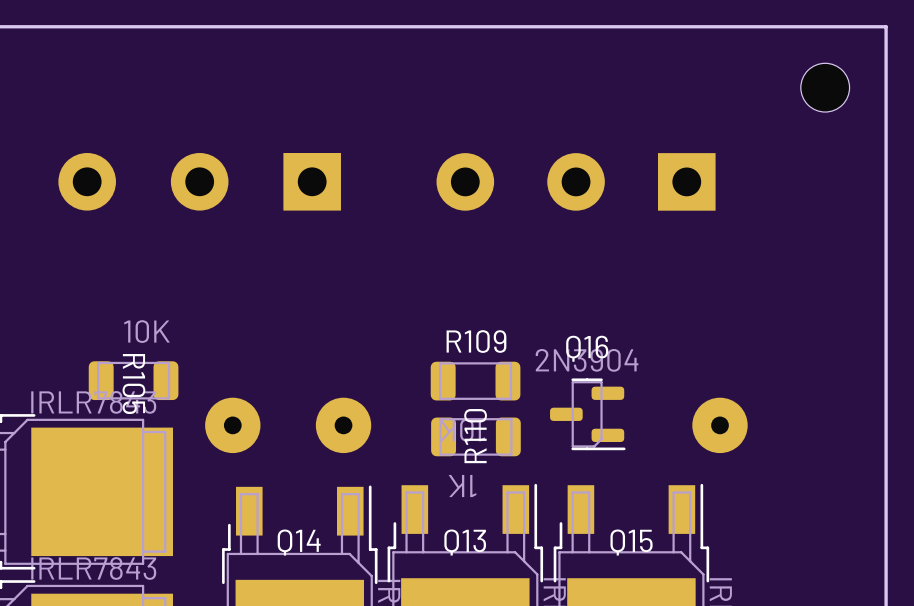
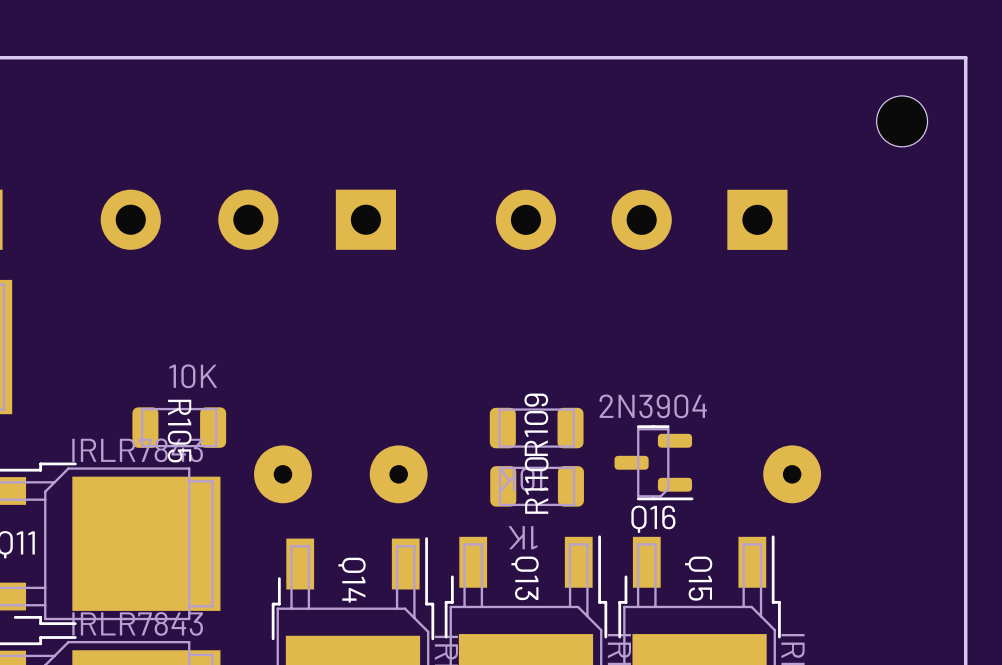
R109 name rotation: 0° (476, 341) -> 90° counterclockwise (536, 424)
Q16 name position: Q16 (587, 348) -> Q16 (653, 519)
Q14 name rotation: 0° (299, 542) -> 90° clockwise (352, 580)
Q13 name rotation: 0° (465, 542) -> 90° clockwise (525, 578)
Q15 name rotation: 0° (631, 542) -> 90° clockwise (698, 578)

